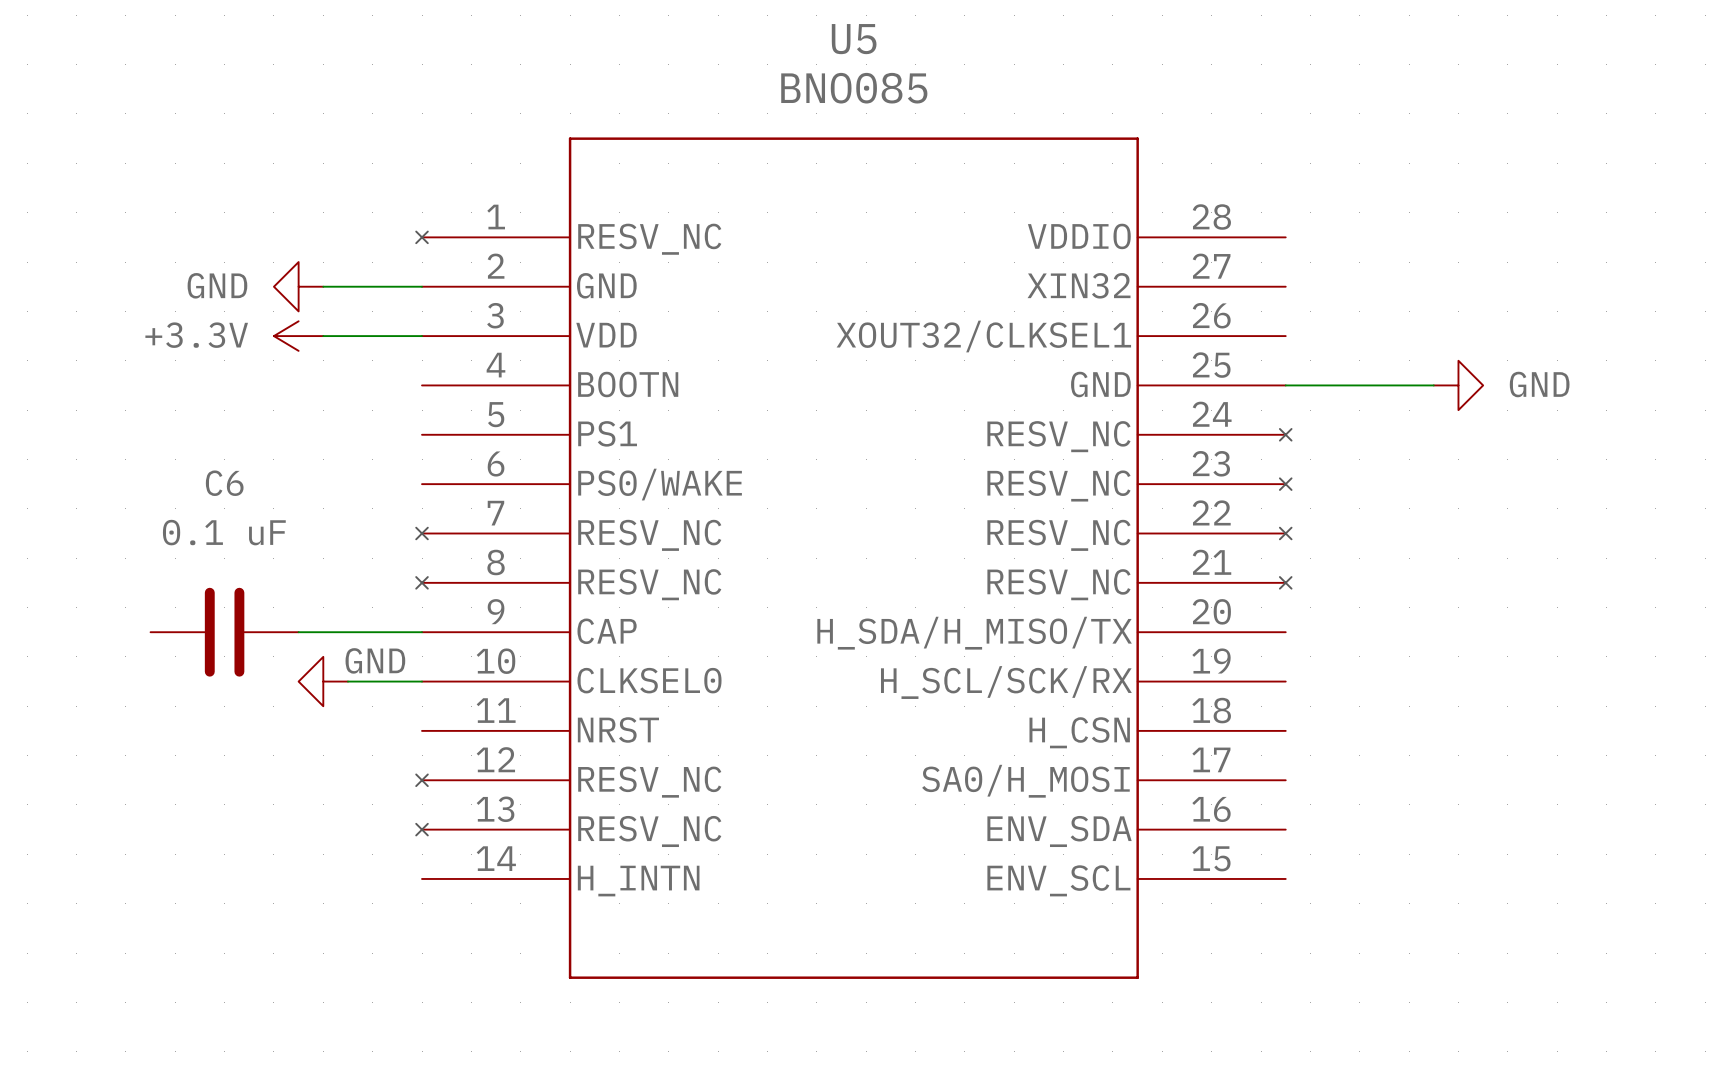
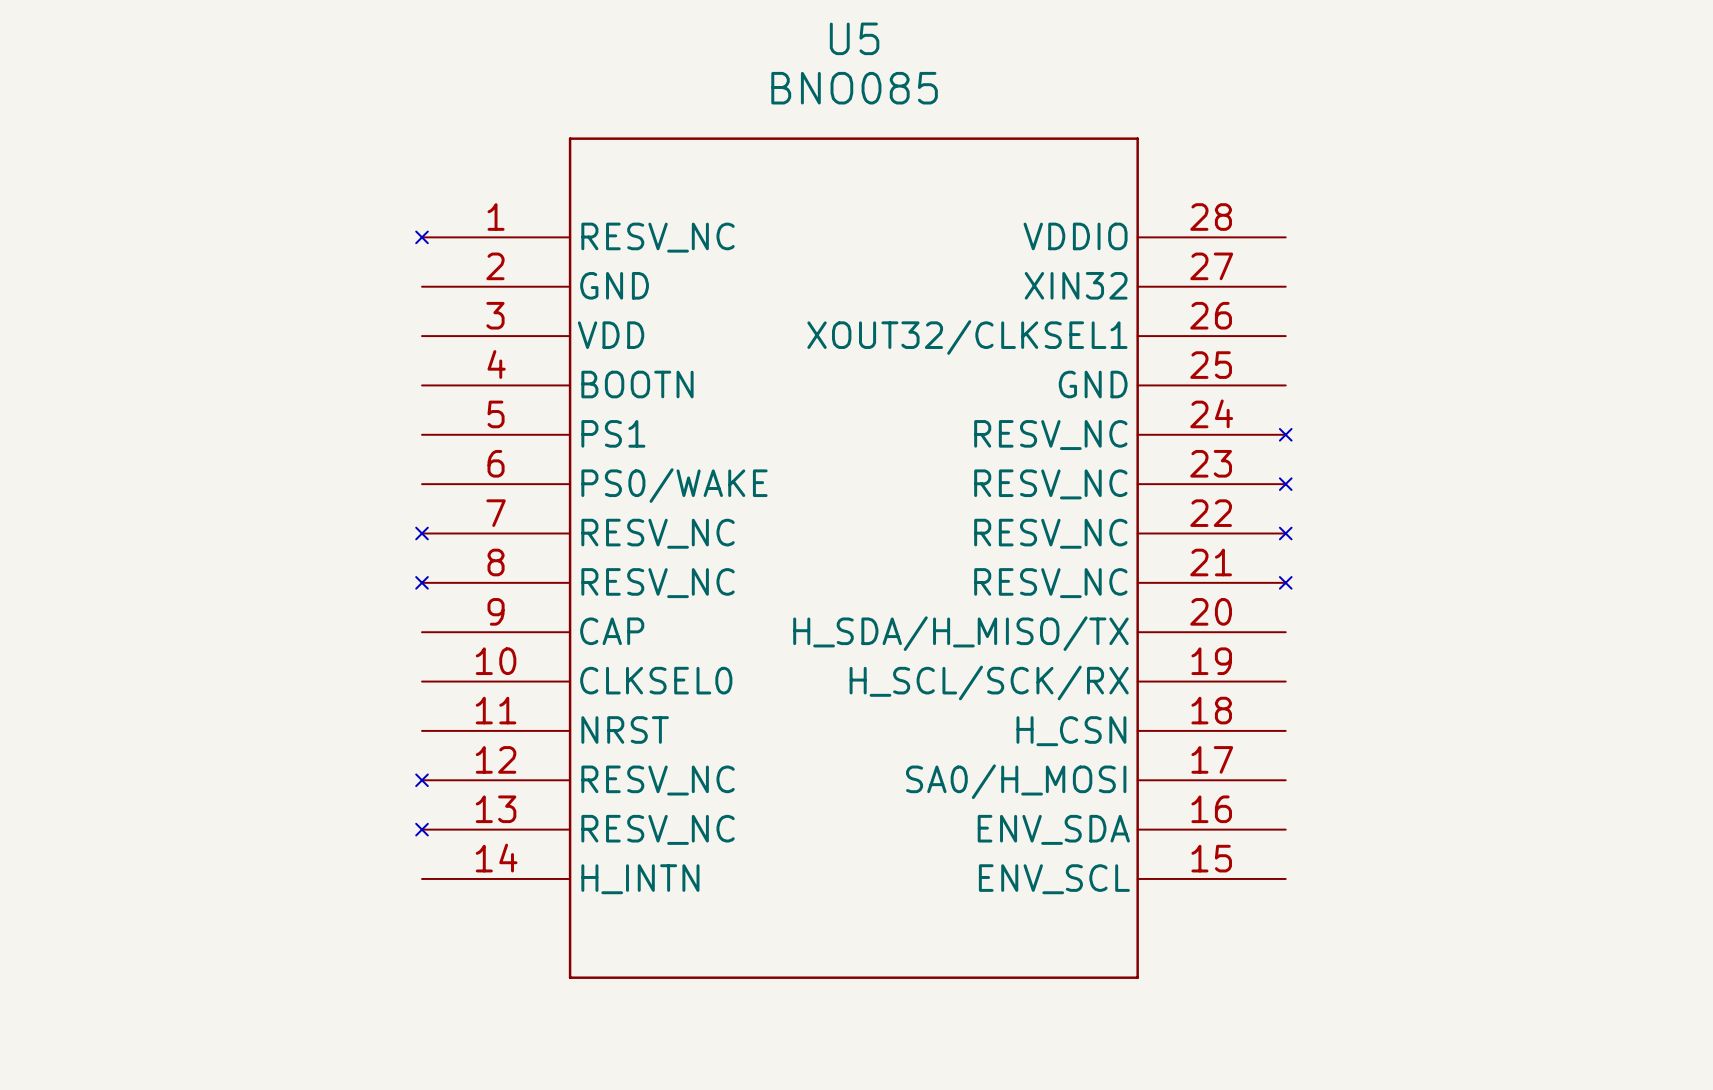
power symbol: GND (298, 286) -> none
wire: (323, 286) (422, 286) -> none
power symbol: +3.3V (298, 336) -> none
wire: (323, 336) (422, 336) -> none
wire: (1285, 385) (1433, 385) -> none
power symbol: GND (1458, 385) -> none
C6: 0.1 uF (224, 632) -> none
wire: (298, 632) (422, 632) -> none
power symbol: GND (323, 681) -> none
wire: (347, 681) (422, 681) -> none

